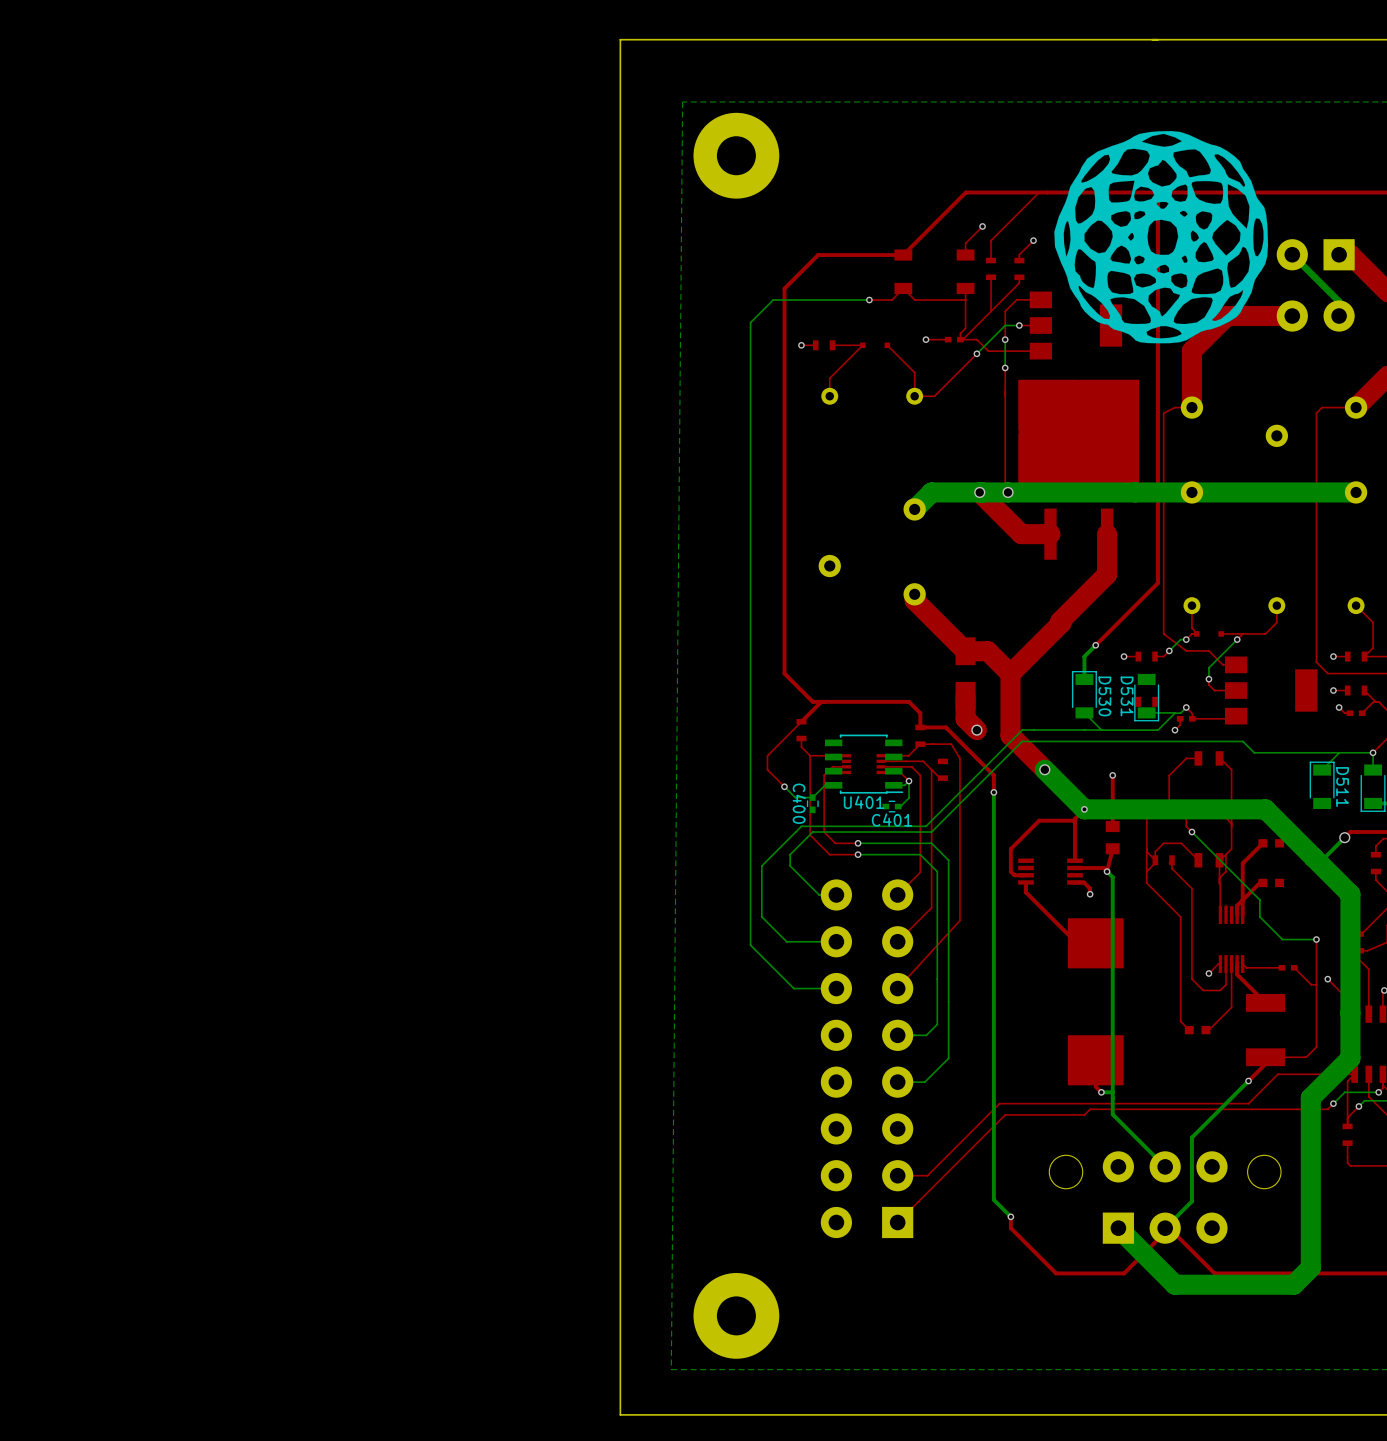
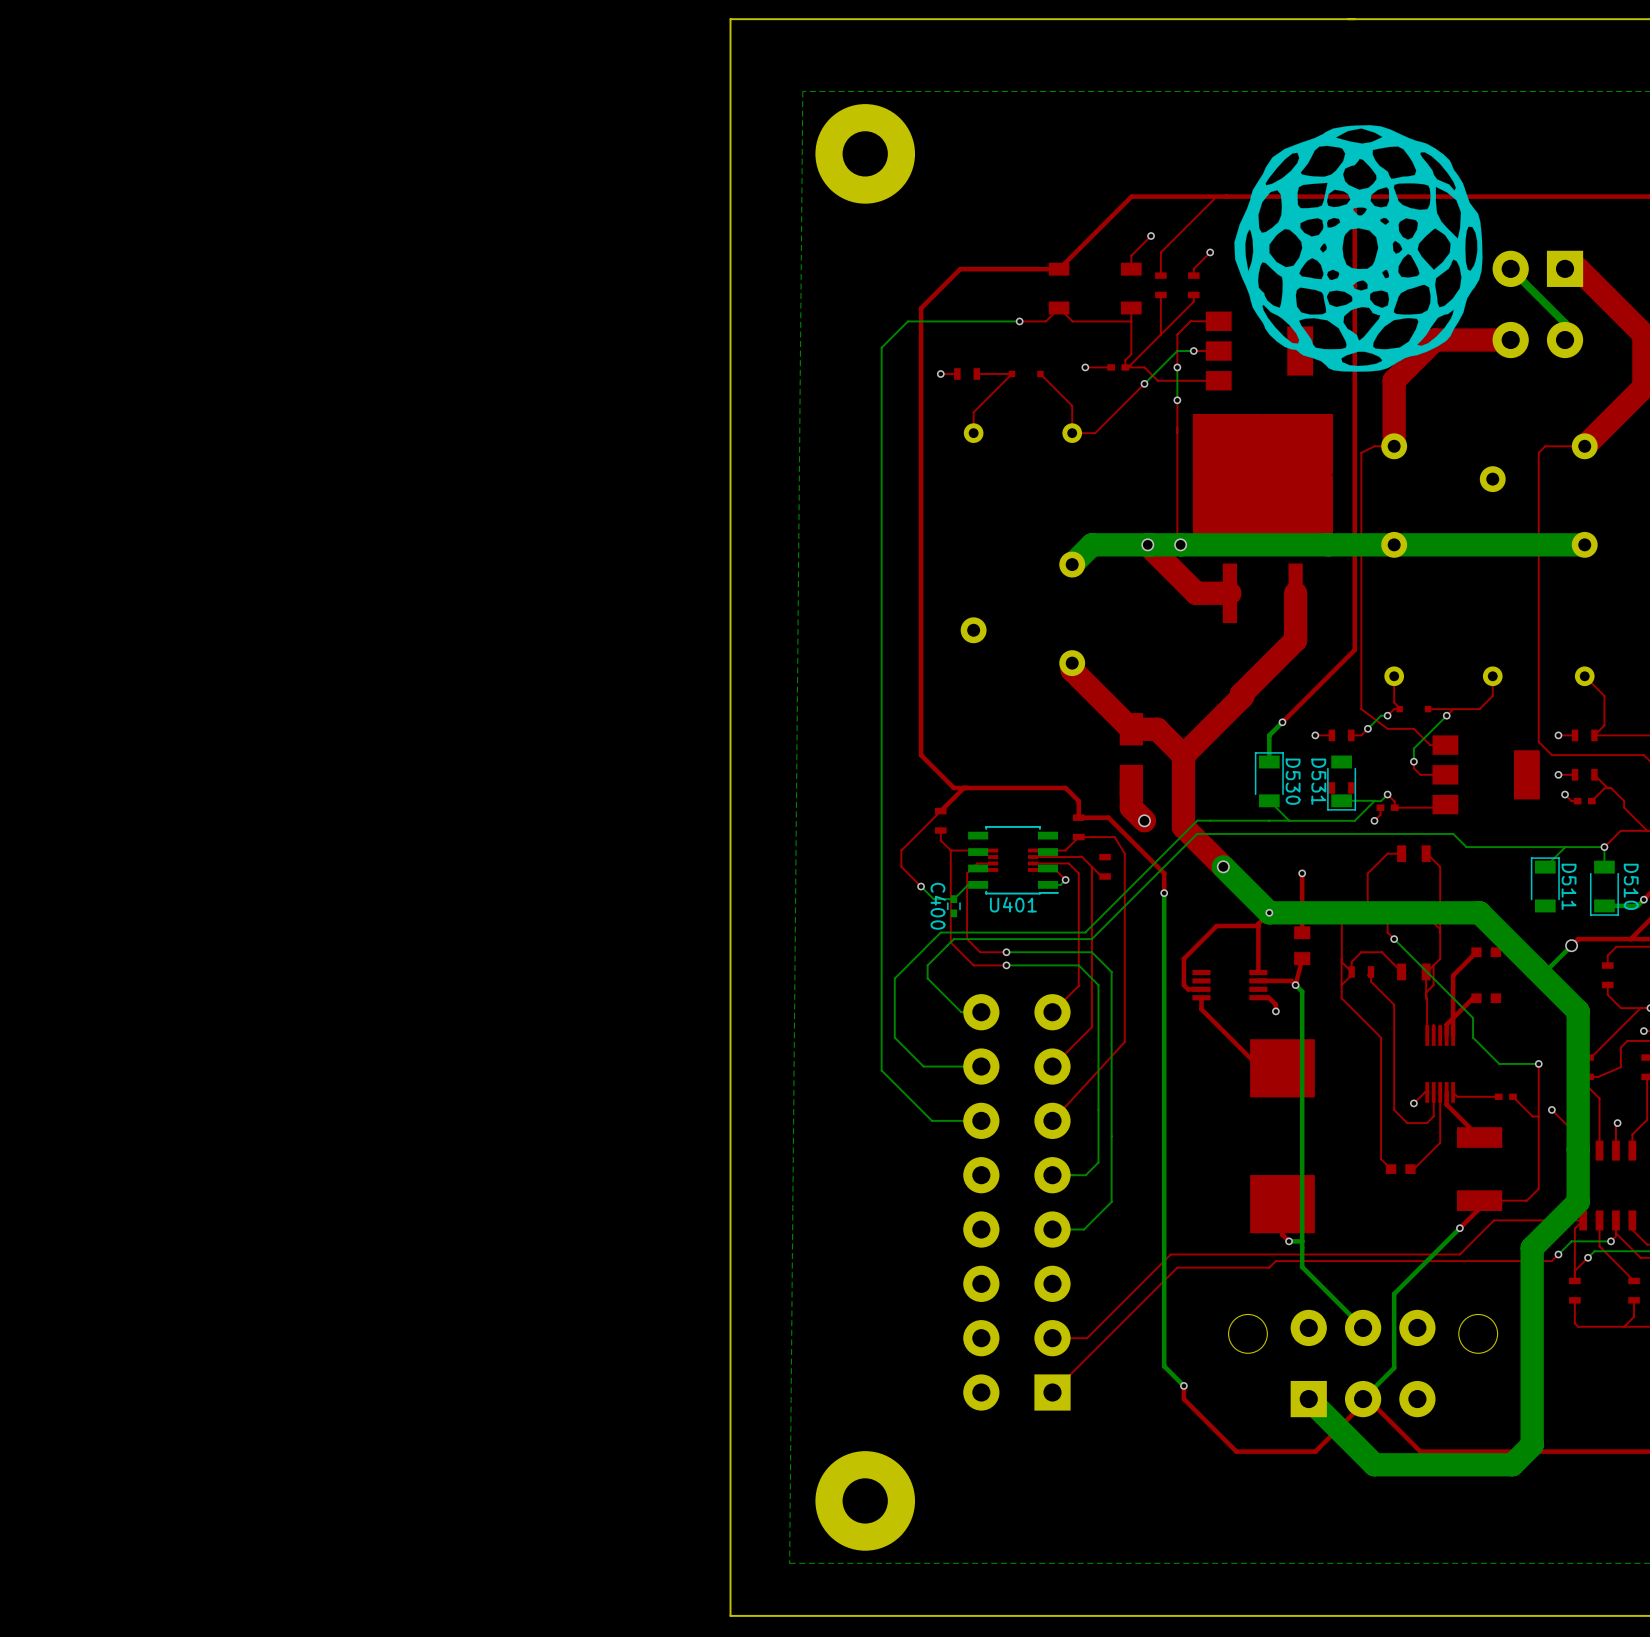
bottom track: (908, 781) (908, 798) (898, 806) -> none
C401: (892, 806) -> none

